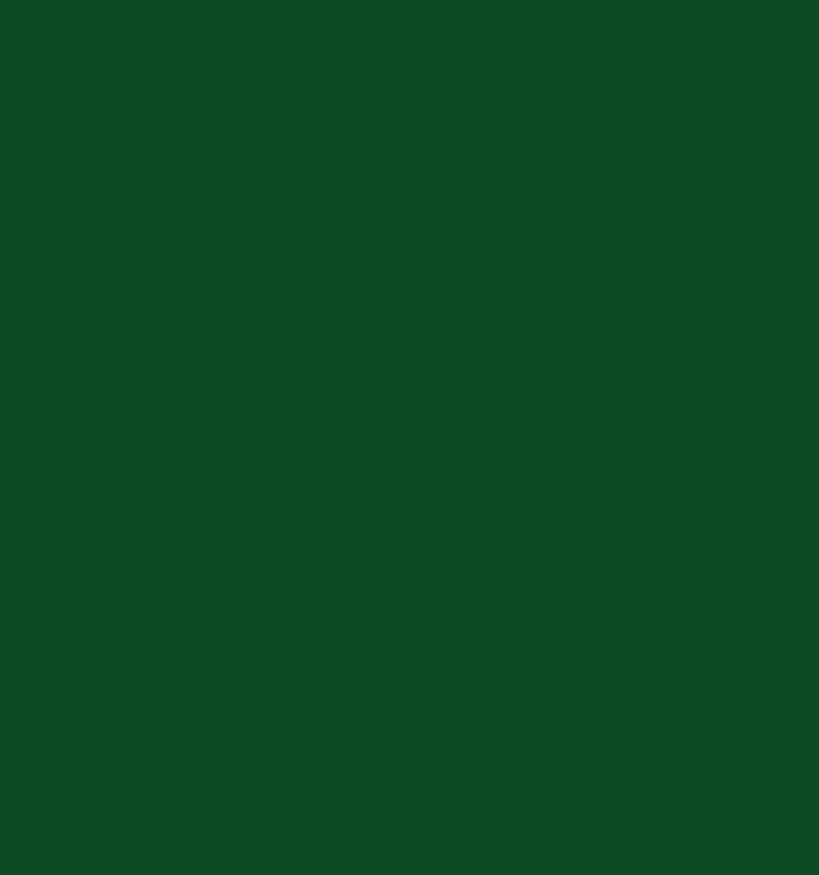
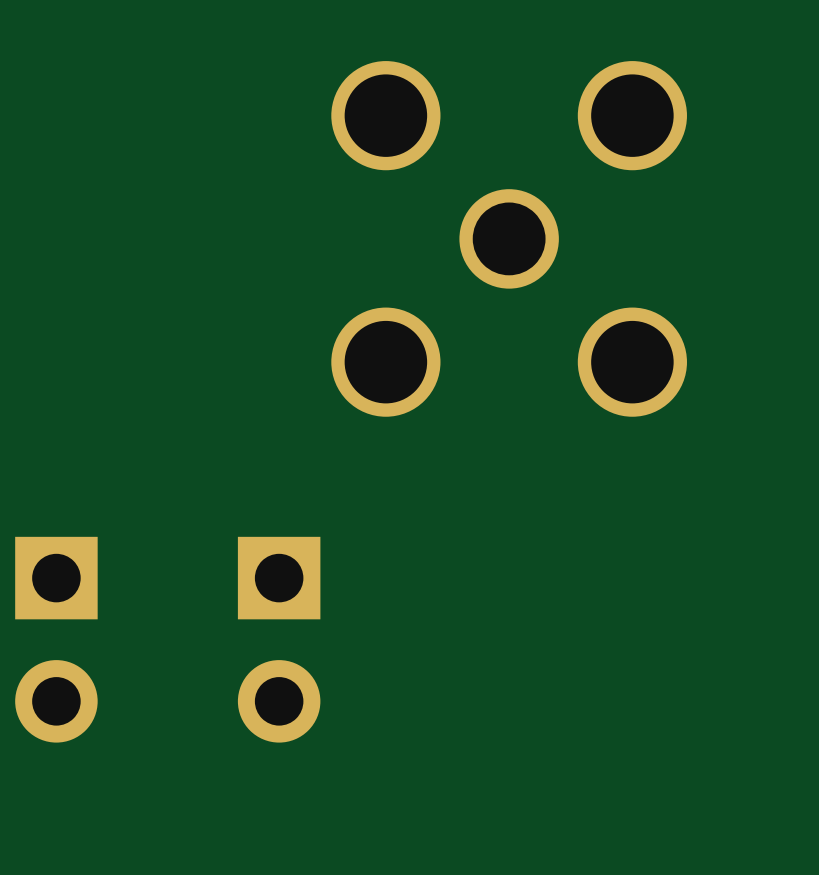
part: none -> (509, 238)
part: none -> (56, 639)
part: none -> (279, 639)

